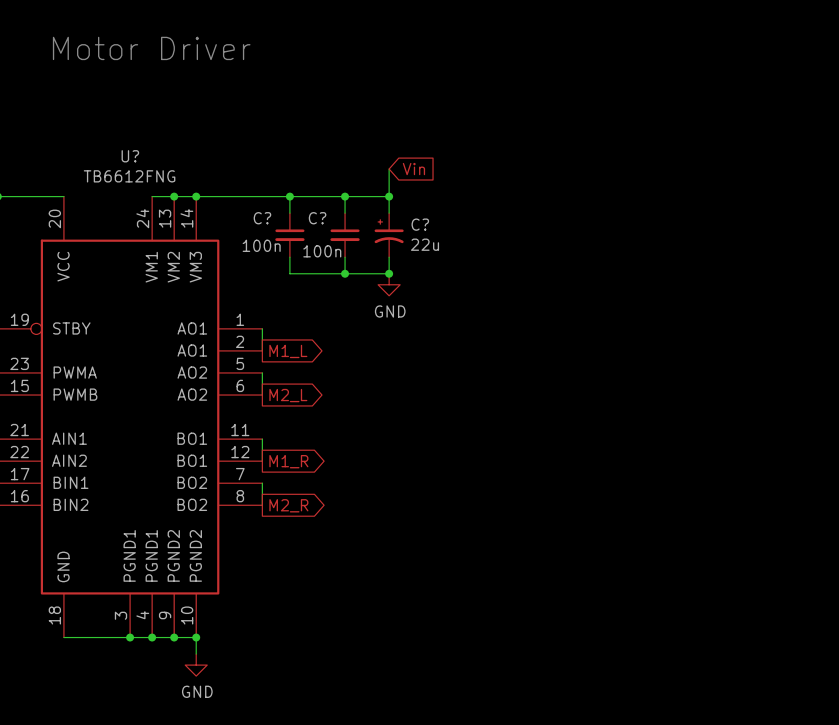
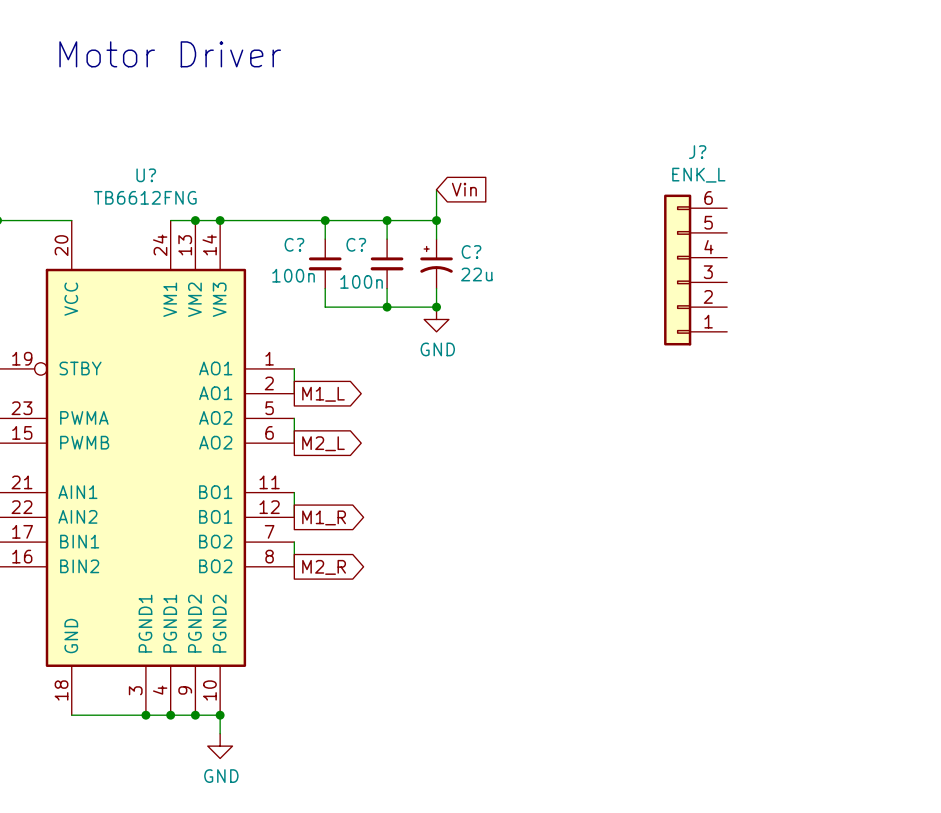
J?: none -> ENK_L (695, 270)

